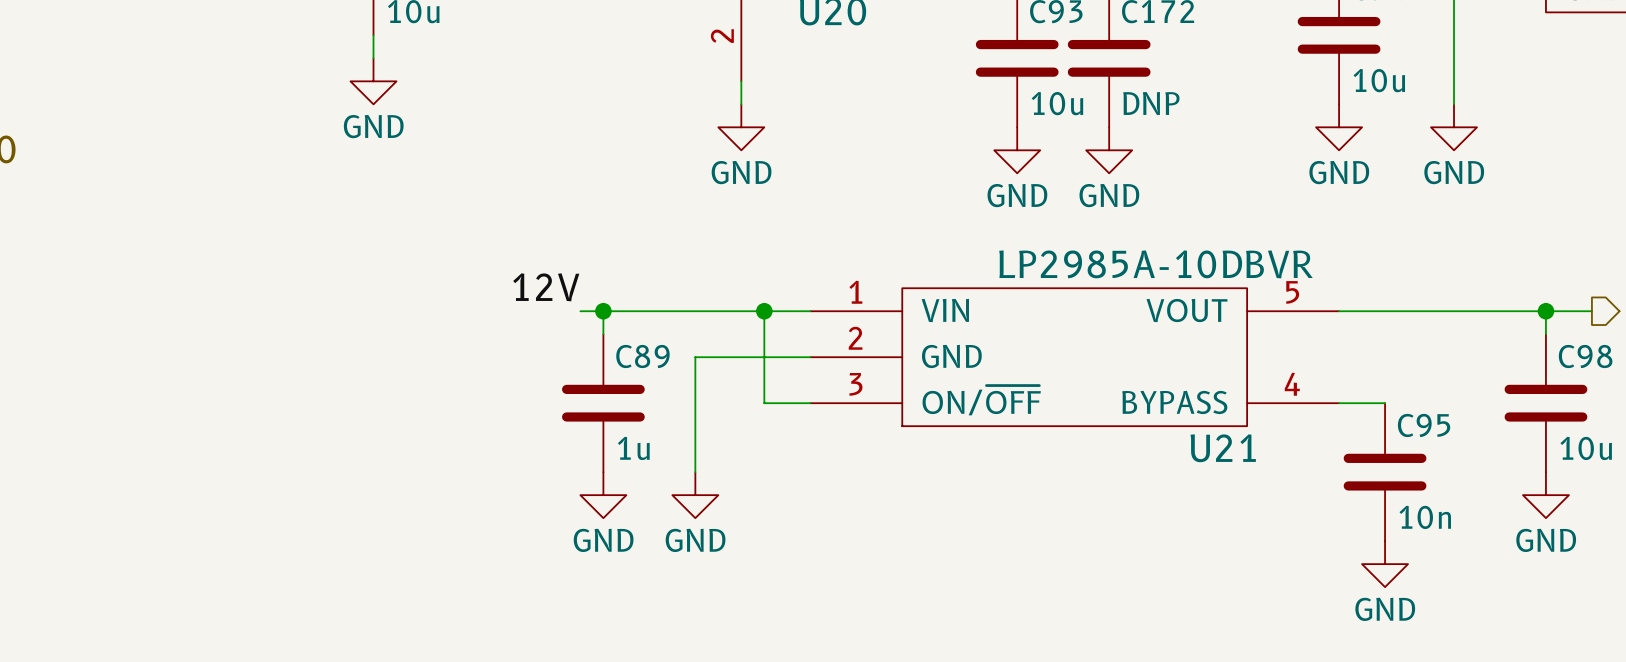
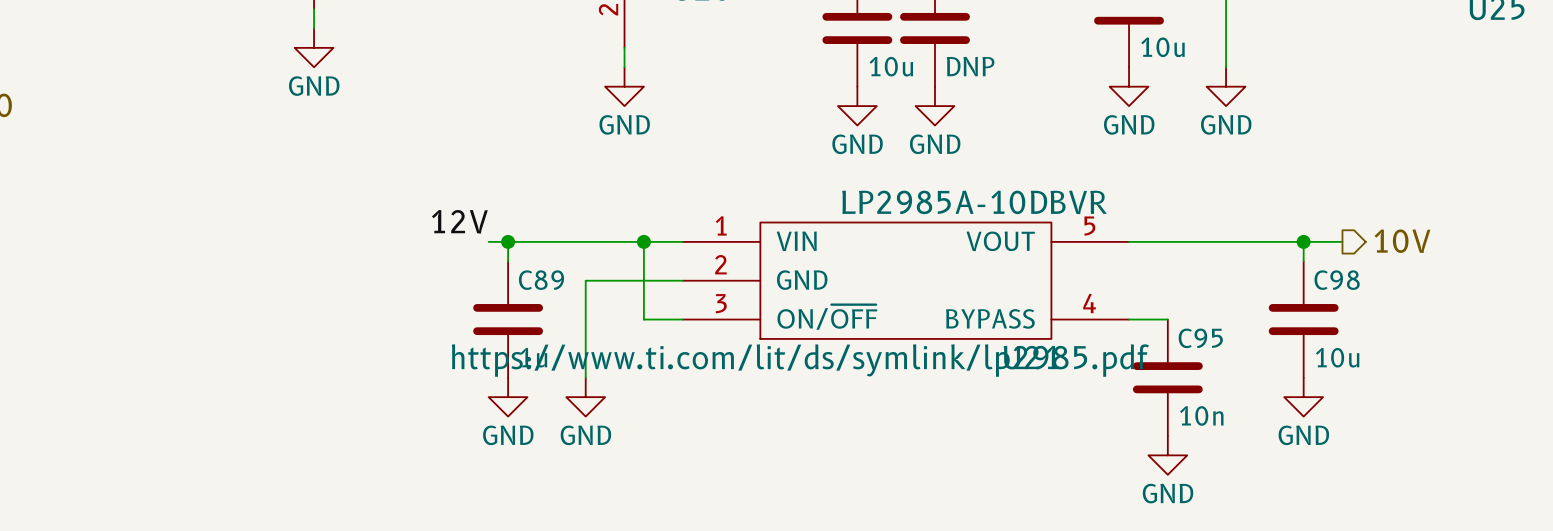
U21 text: none -> https://www.ti.com/lit/ds/symlink/lp2985.pdf (800, 360)

